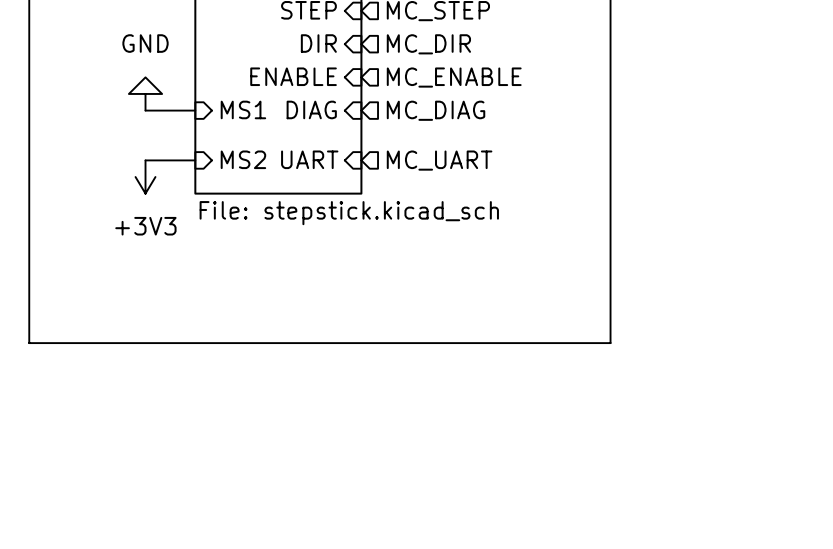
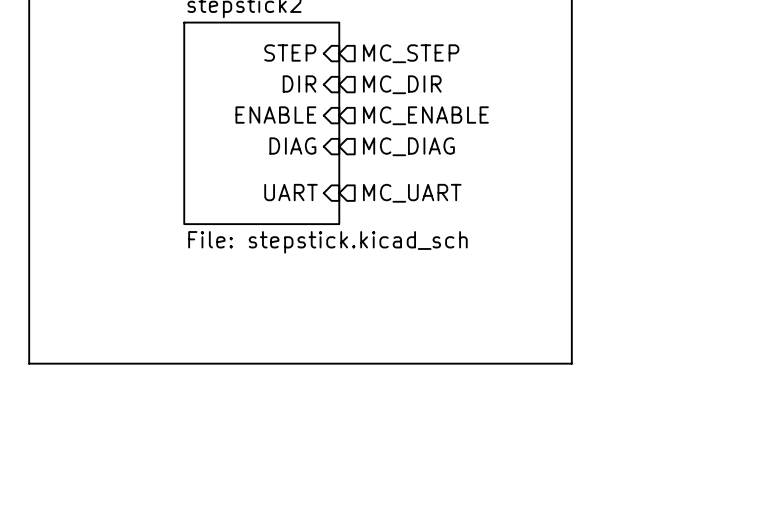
power symbol: GND (145, 93) -> none
sheet pin: MS1 (243, 109) -> none
wire: (145, 110) (195, 110) -> none
sheet pin: MS2 (243, 159) -> none
wire: (145, 160) (195, 160) -> none
power symbol: +3V3 (145, 177) -> none

